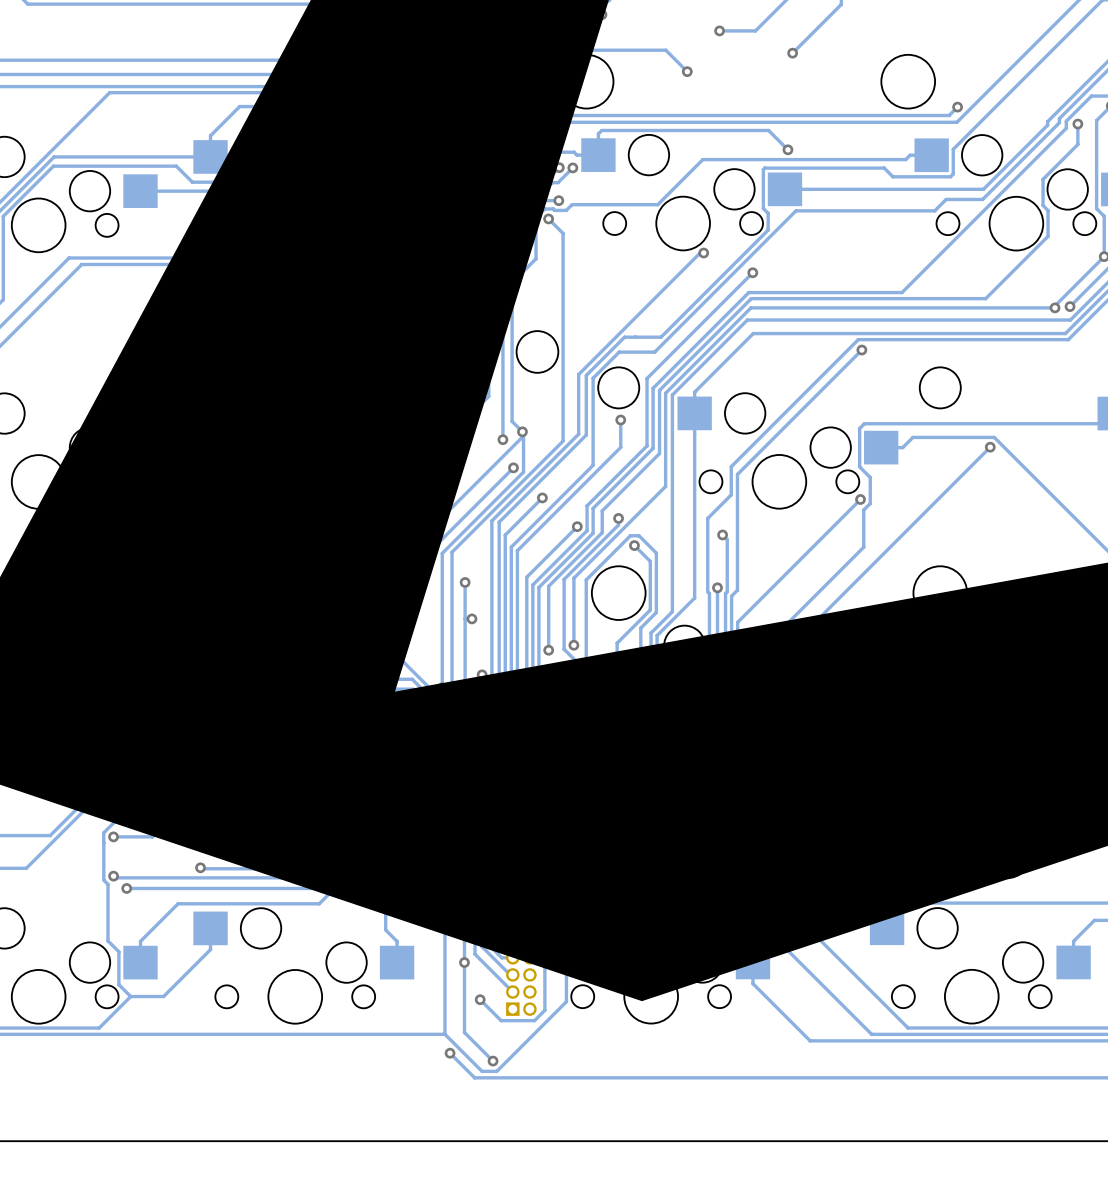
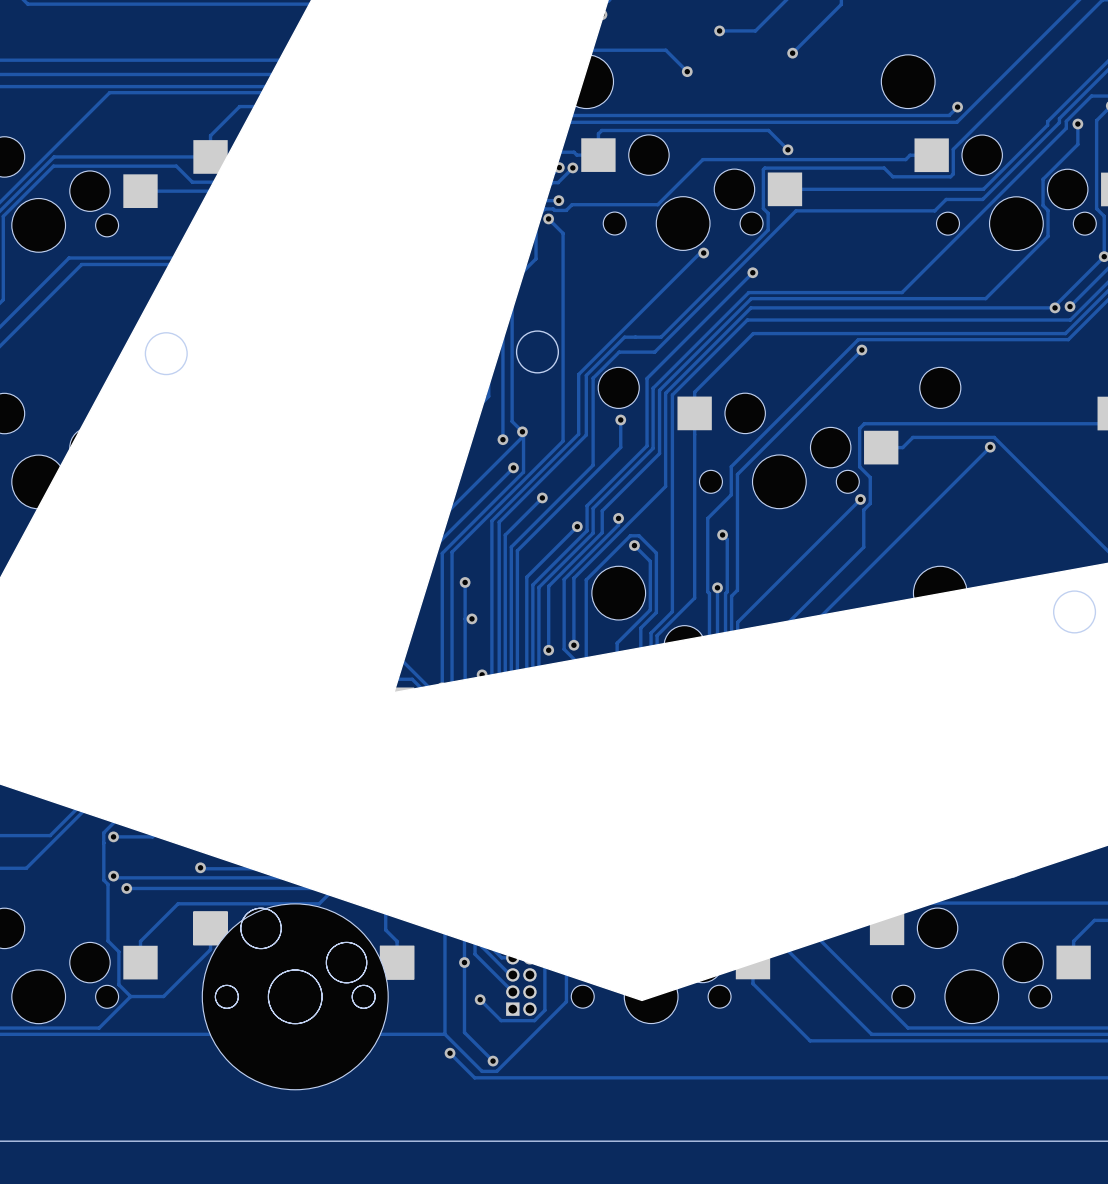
part: none -> (303, 996)

